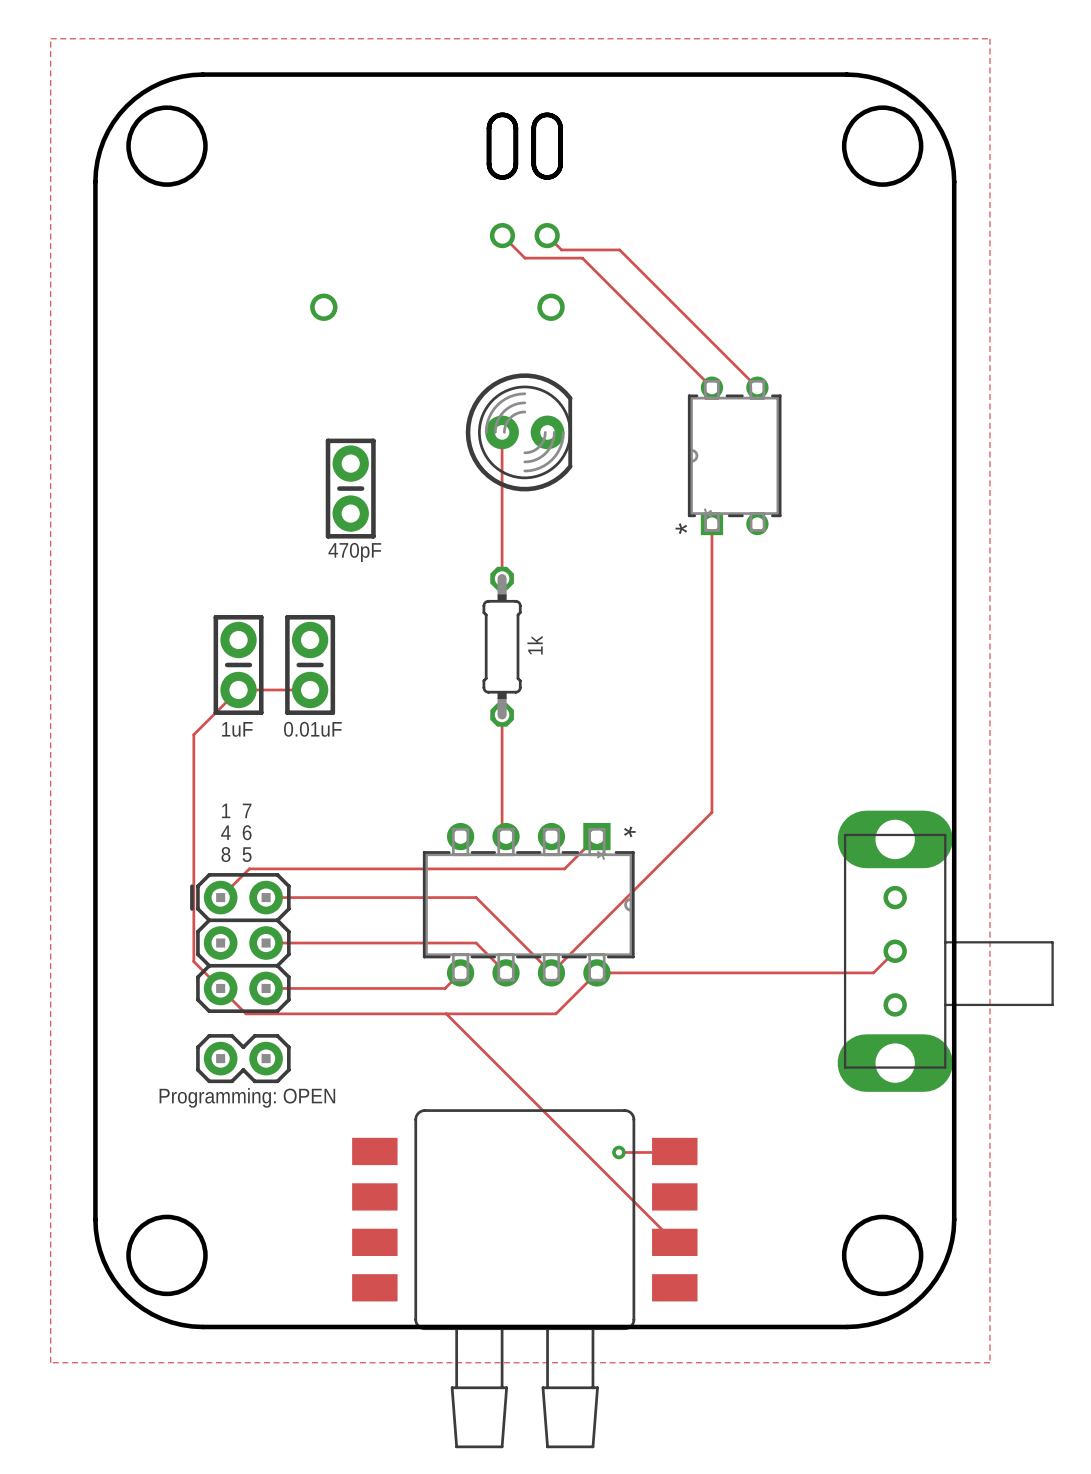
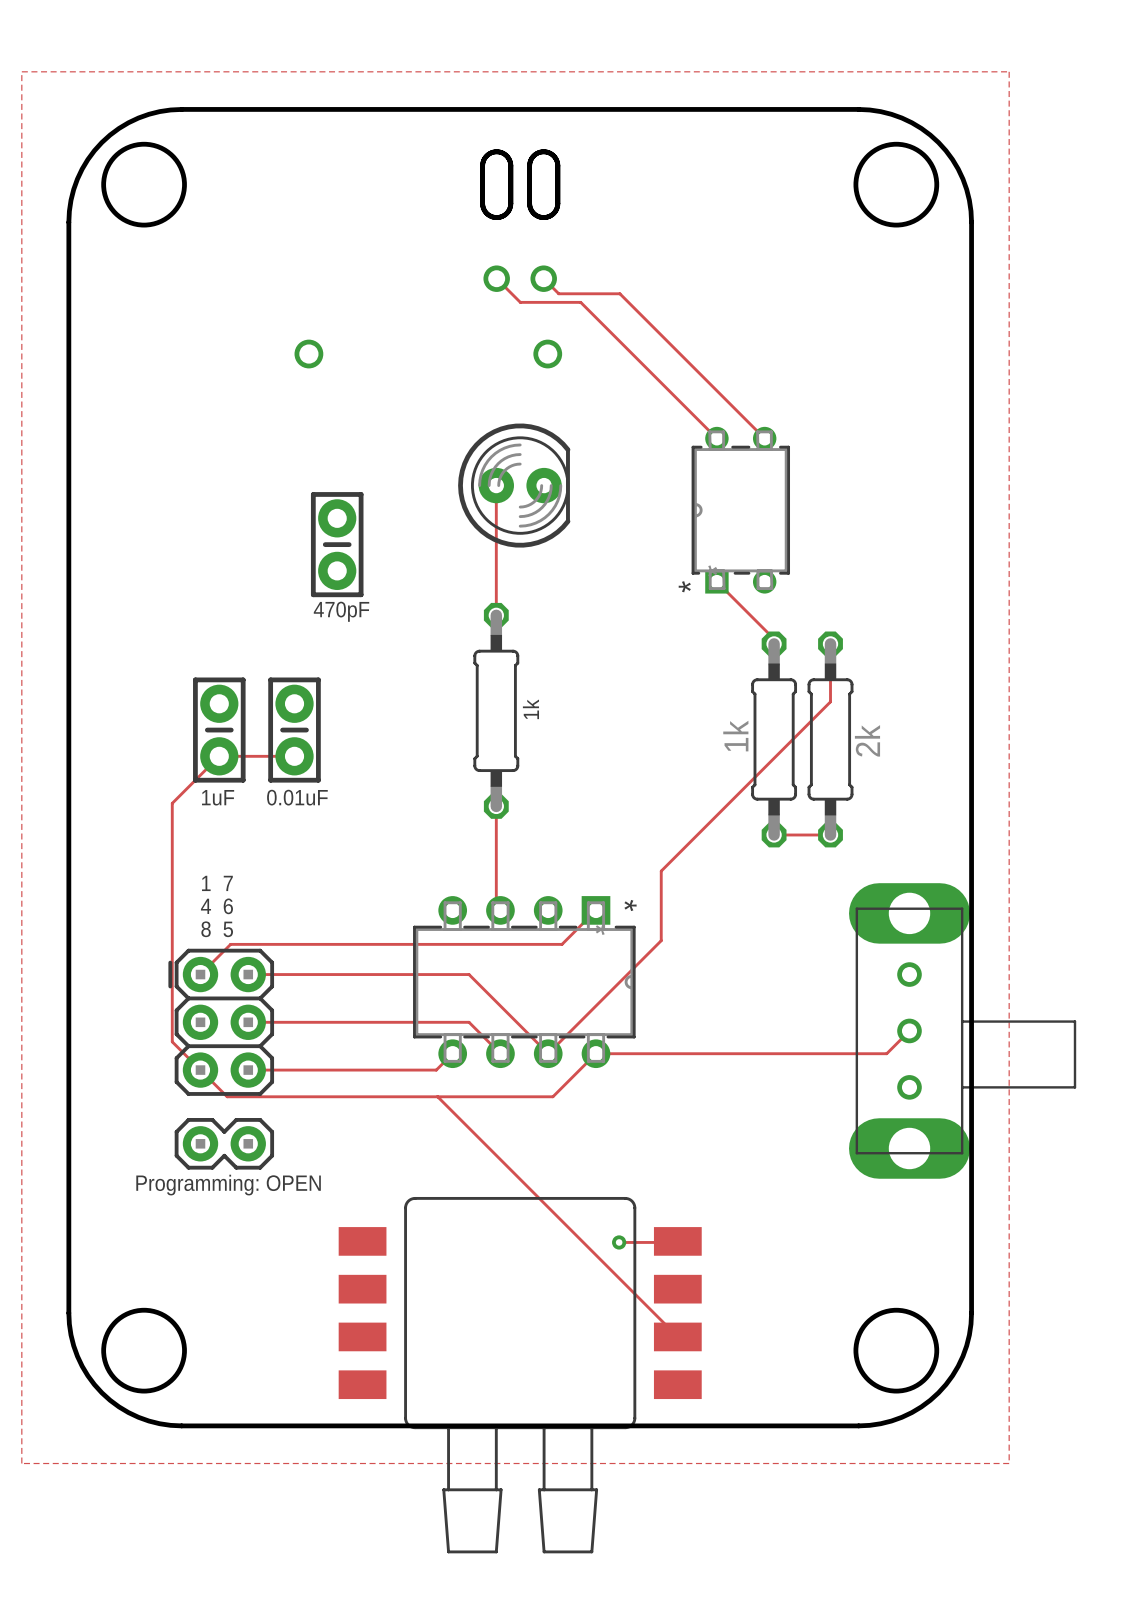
track: (711, 524) (711, 812) (659, 865) -> (830, 643) (830, 701) (661, 871) (661, 940)
track: none -> (716, 581) (774, 639) (774, 643)
track: (502, 555) (502, 578) -> none
part footprint: [482, 566, 522, 727] -> [473, 602, 520, 819]
part: none -> 1k (774, 739)
part: none -> 2k (830, 739)
track: (502, 714) (502, 737) -> none
track: none -> (774, 834) (830, 834)

